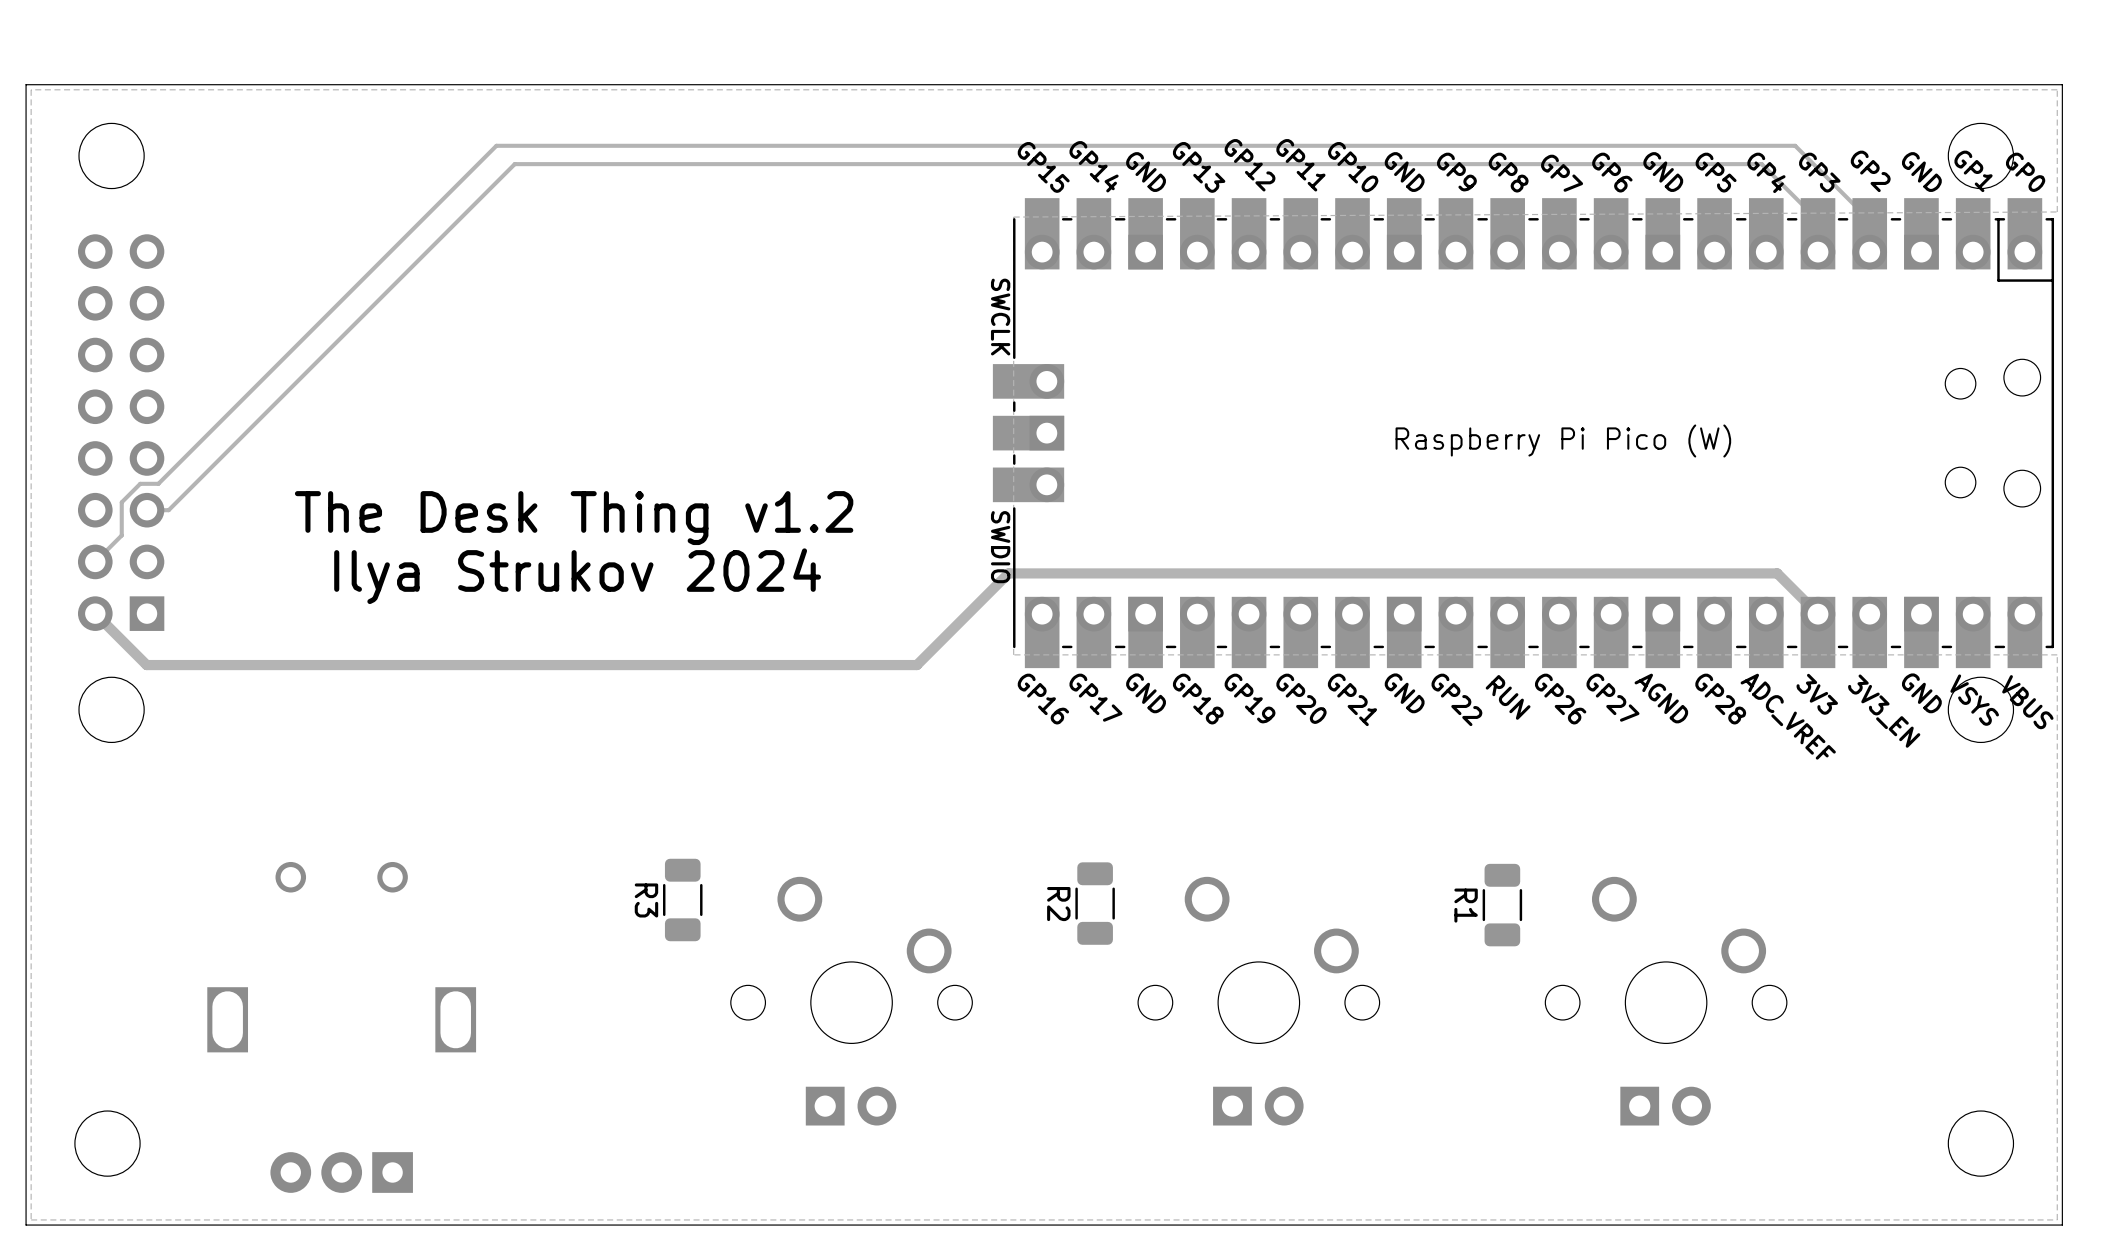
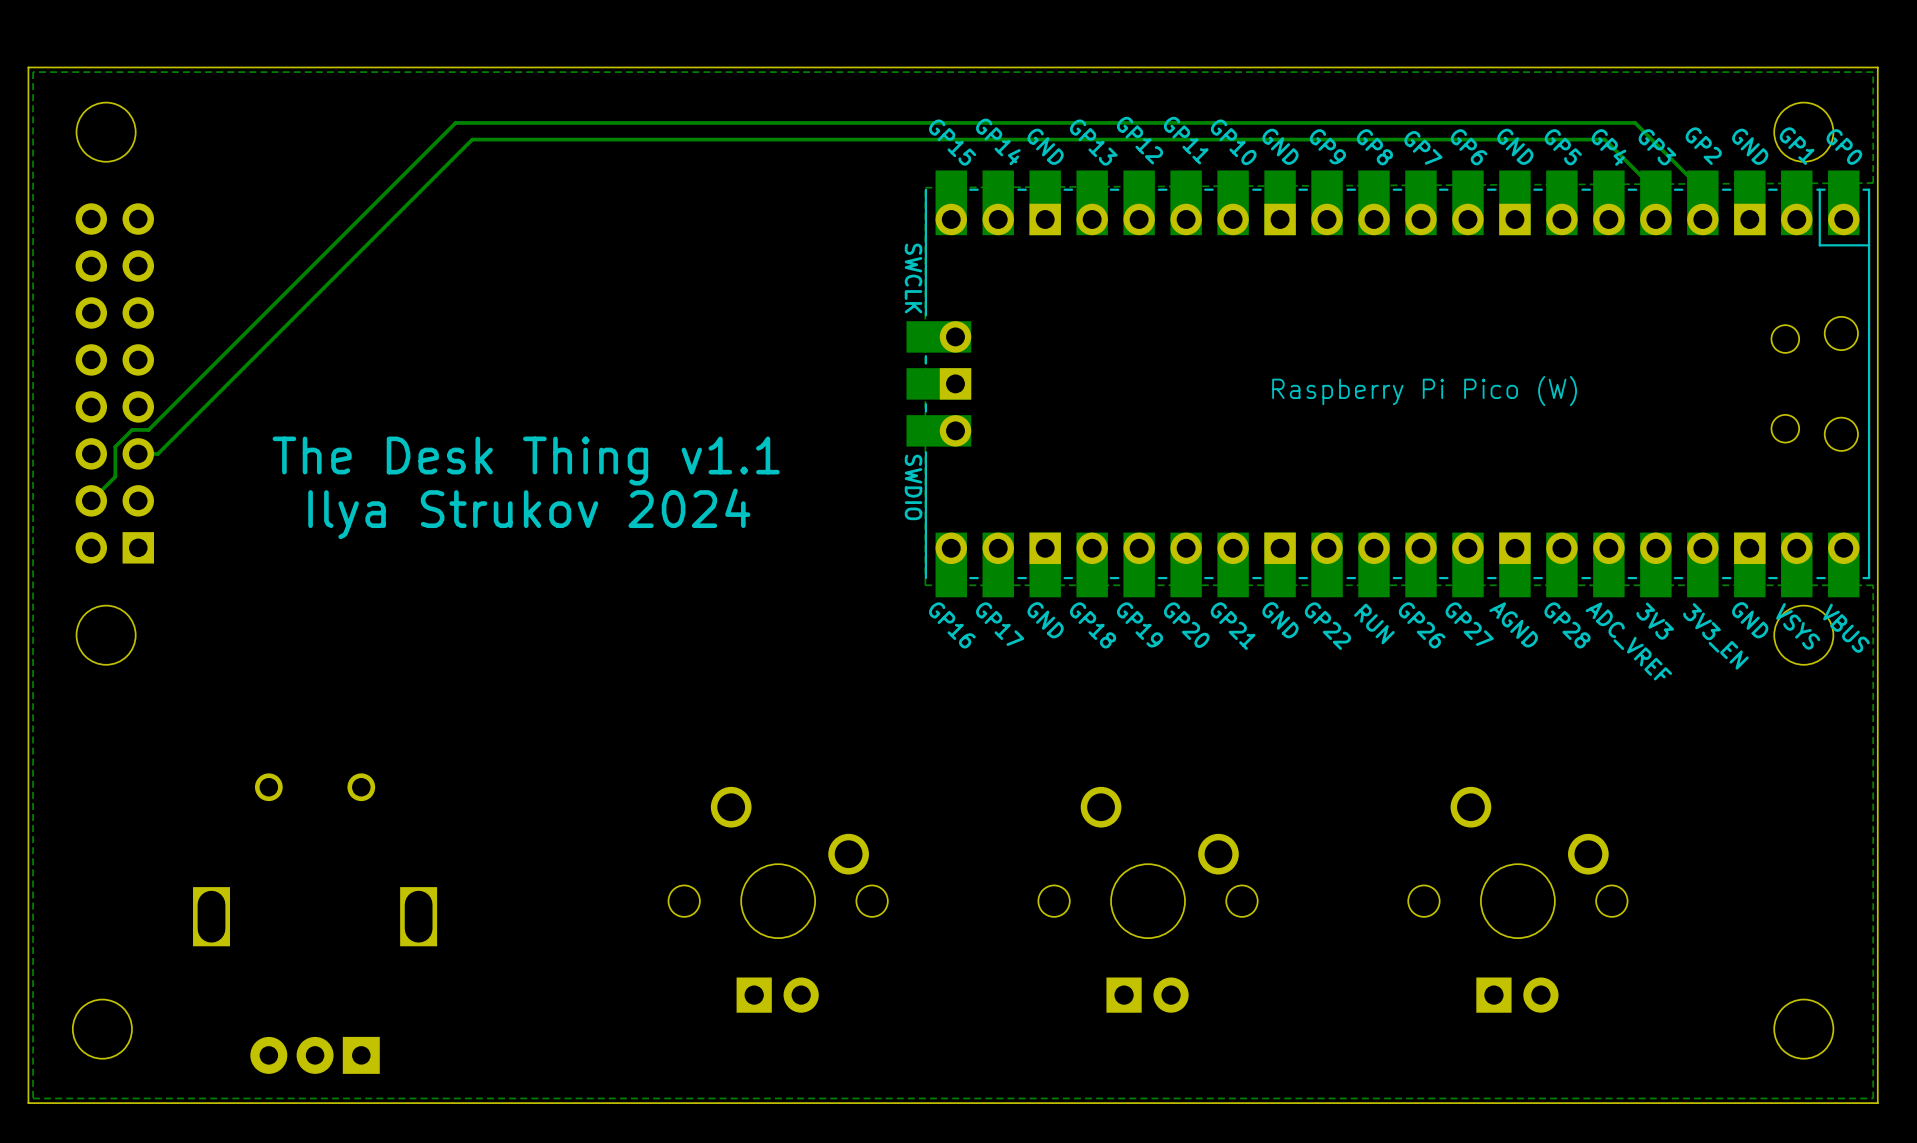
text: The Desk Thing v1.2 (574, 518) -> The Desk Thing v1.1 (526, 461)
track: (95, 613) (146, 665) (916, 665) (1008, 573) (1777, 573) (1818, 614) -> none
R3: (682, 899) -> none
R2: (1095, 903) -> none
R1: (1502, 905) -> none

